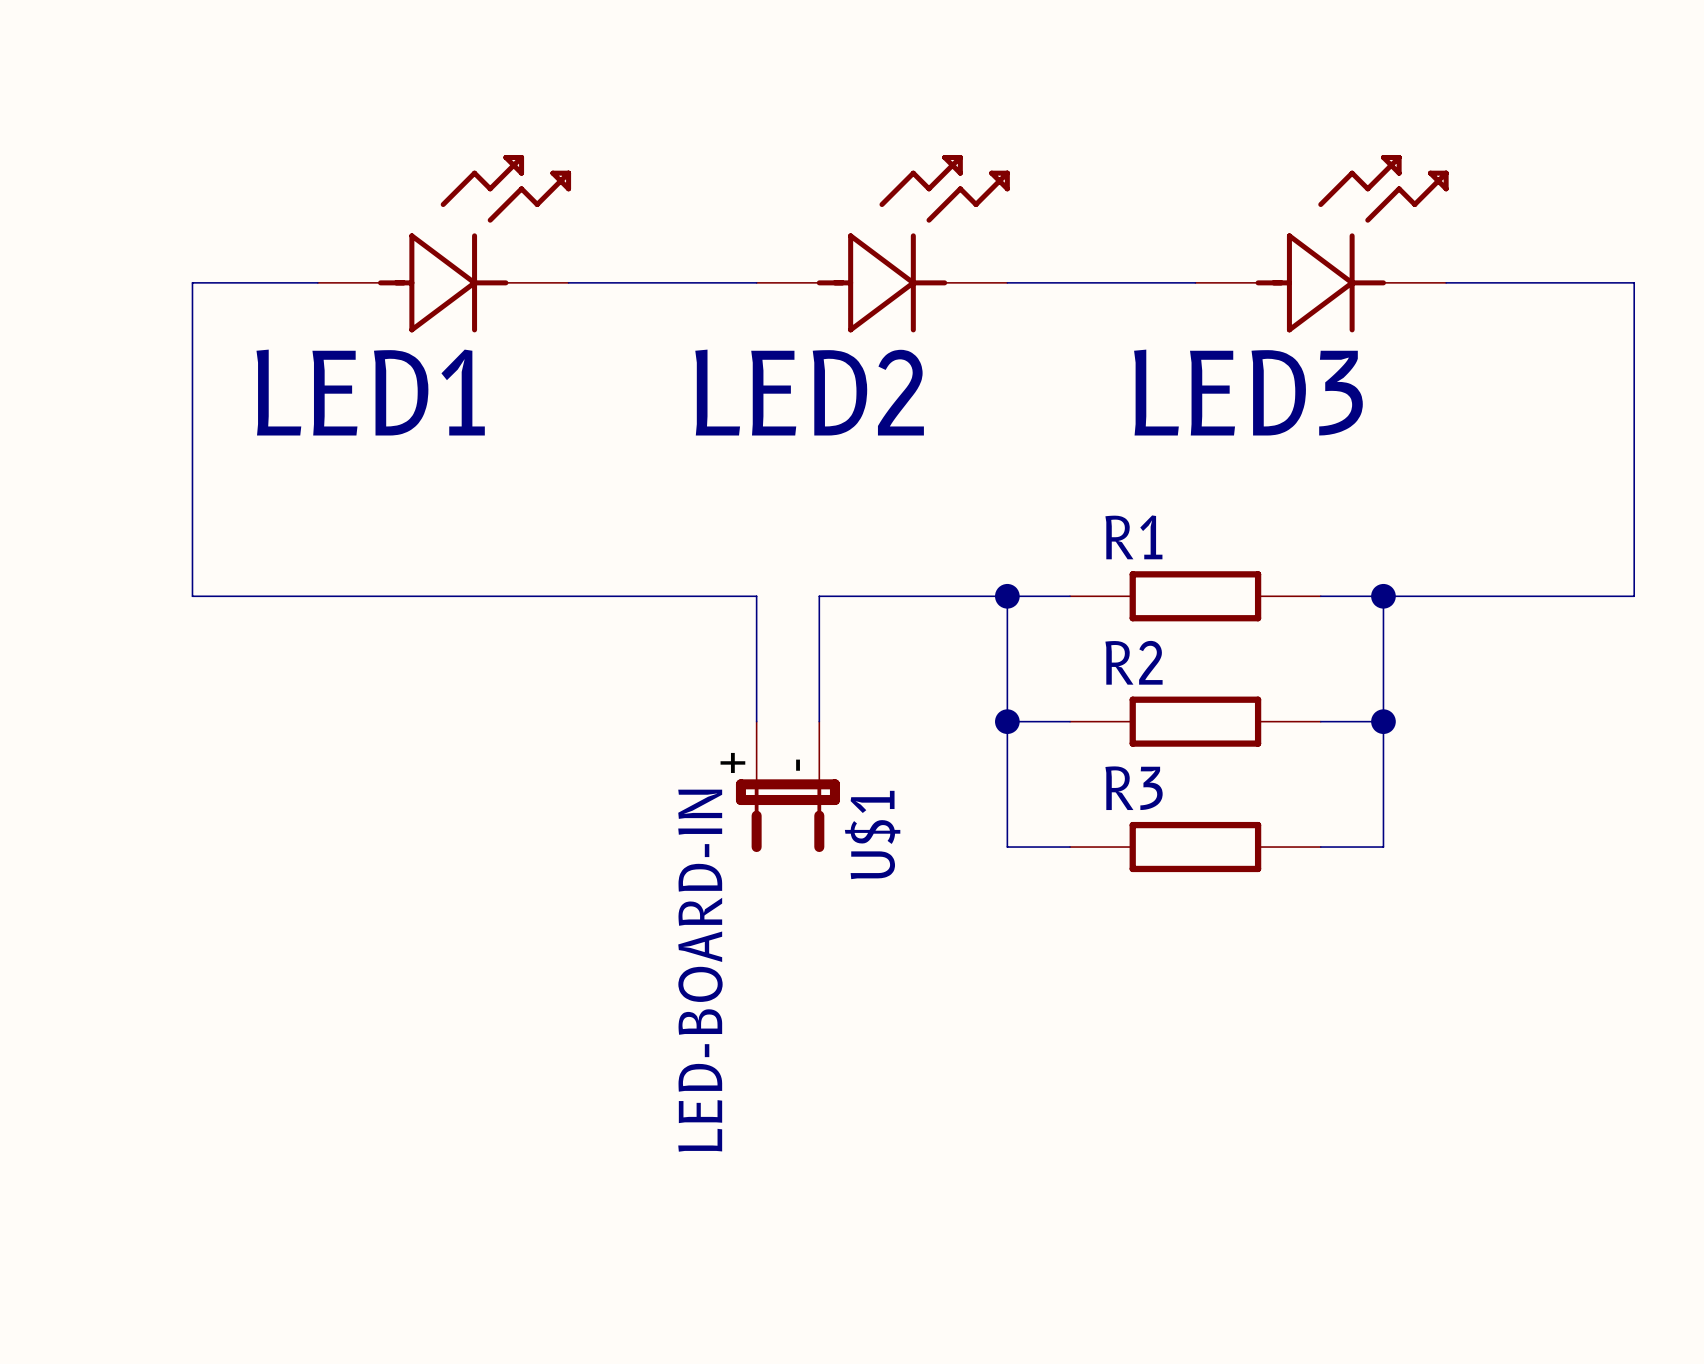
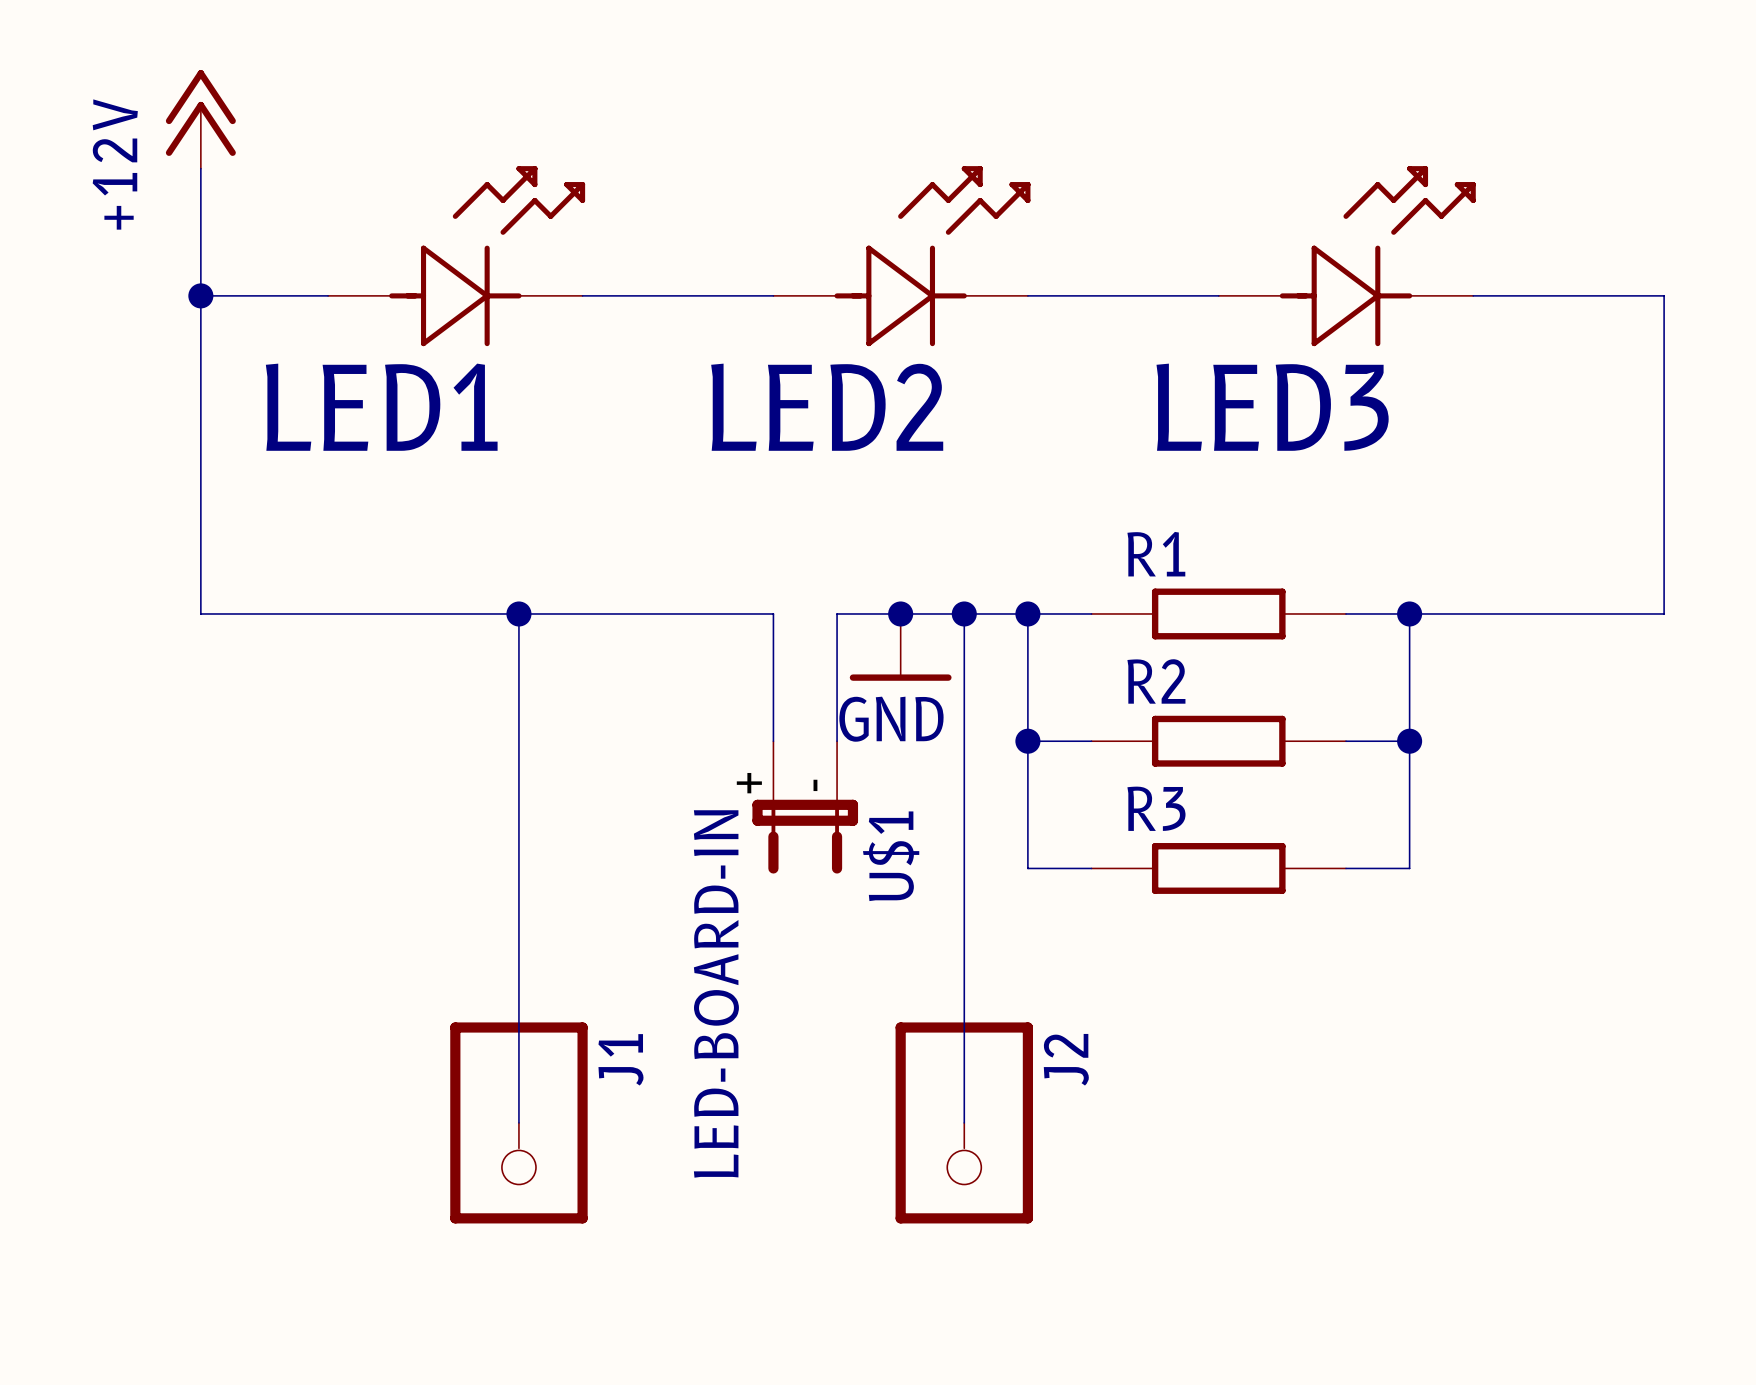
power symbol: none -> +12V (200, 119)
wire: none -> (200, 168) (200, 295)
junction: none -> (200, 295)
wire: none -> (518, 613) (518, 1122)
junction: none -> (518, 613)
junction: none -> (900, 613)
wire: none -> (964, 613) (964, 1122)
junction: none -> (964, 613)
power symbol: none -> GND (900, 647)
J1: none -> (518, 1122)
J2: none -> (964, 1122)

